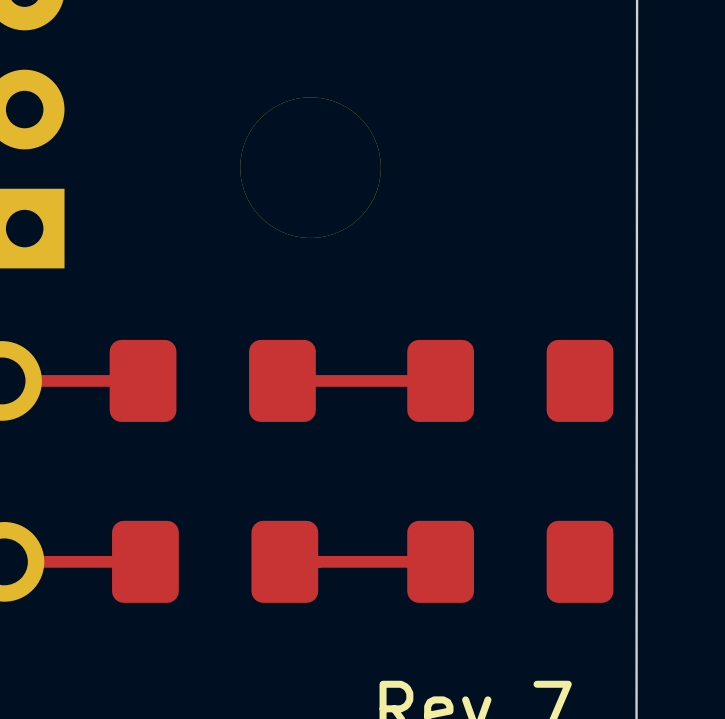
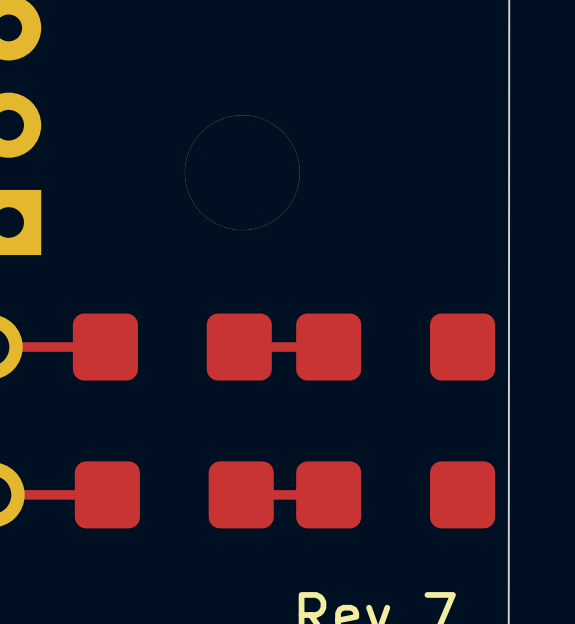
part footprint: [109, 339, 316, 422] -> [72, 313, 272, 381]
part footprint: [407, 339, 614, 422] -> [296, 313, 496, 381]
part footprint: [112, 520, 319, 603] -> [74, 461, 274, 529]
part footprint: [407, 520, 614, 603] -> [296, 461, 496, 529]

